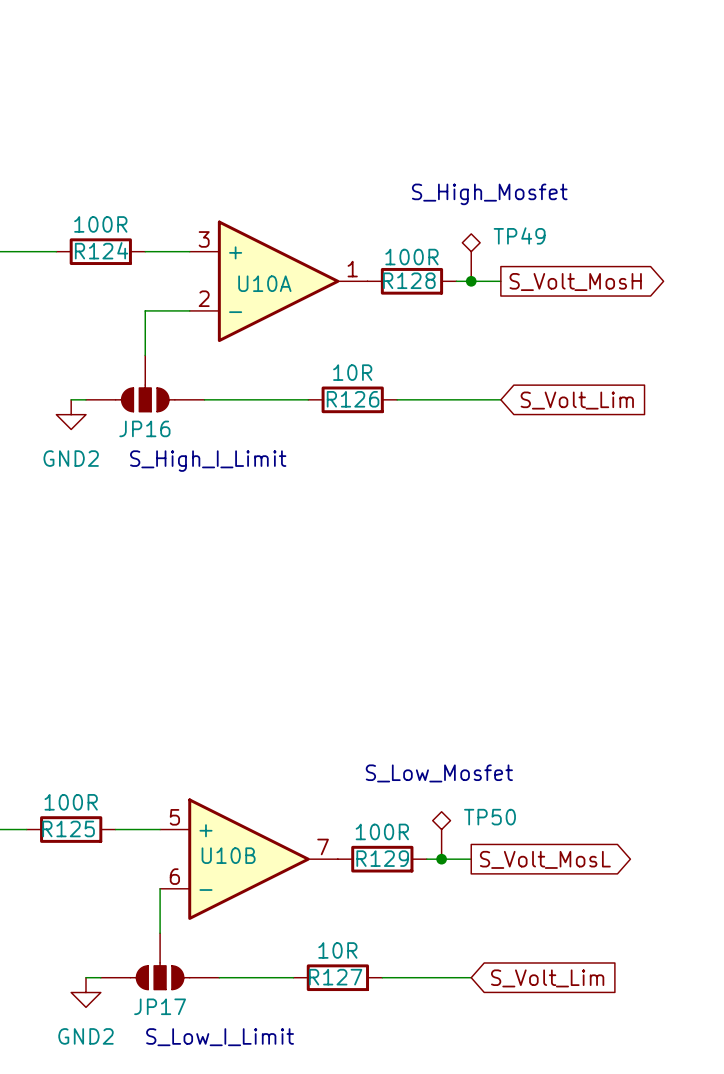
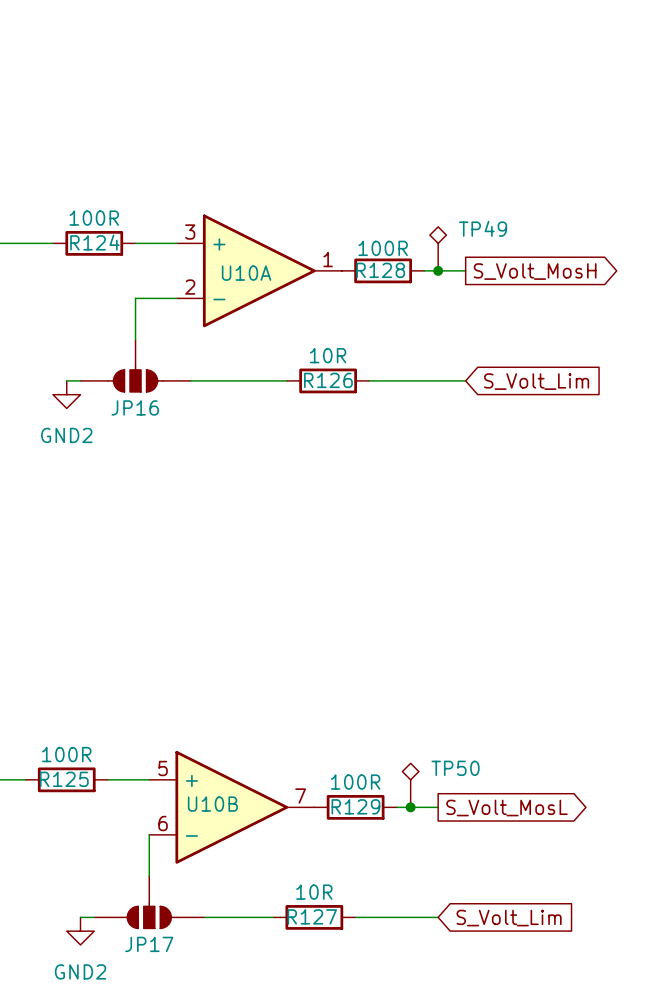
text: S_High_Mosfet (489, 194) -> none
text: S_High_I_Limit (208, 461) -> none
text: S_Low_Mosfet (439, 773) -> none
text: S_Low_I_Limit (220, 1037) -> none

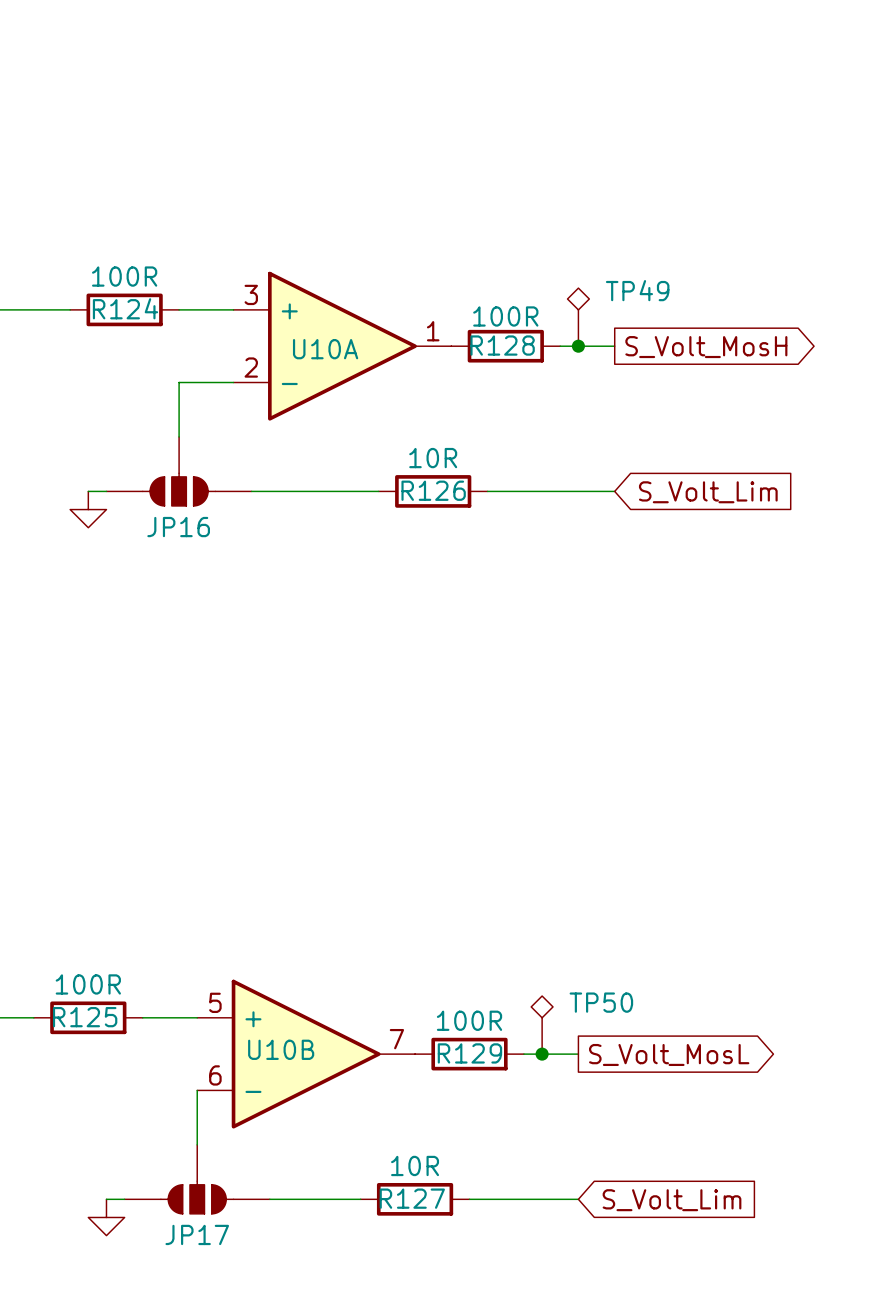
power symbol text: GND2 (66, 435) -> none
power symbol text: GND2 (80, 971) -> none

